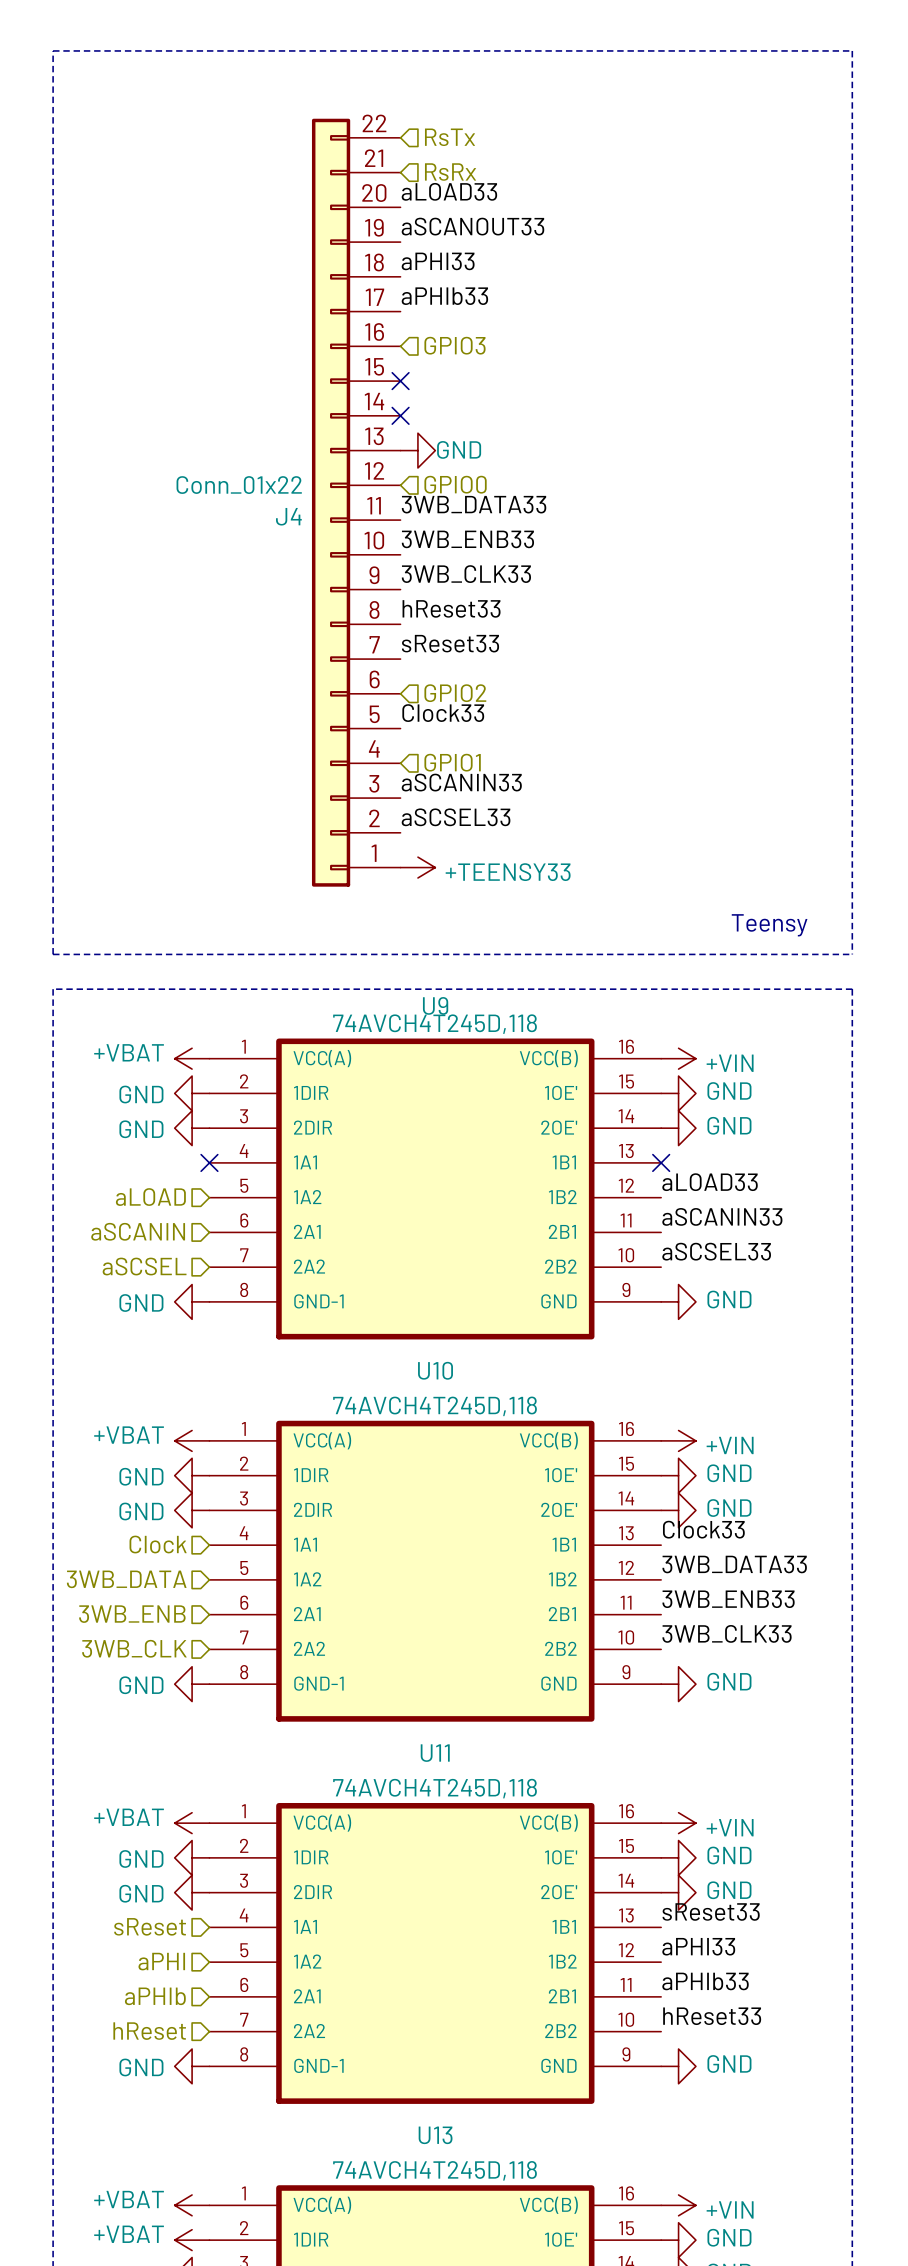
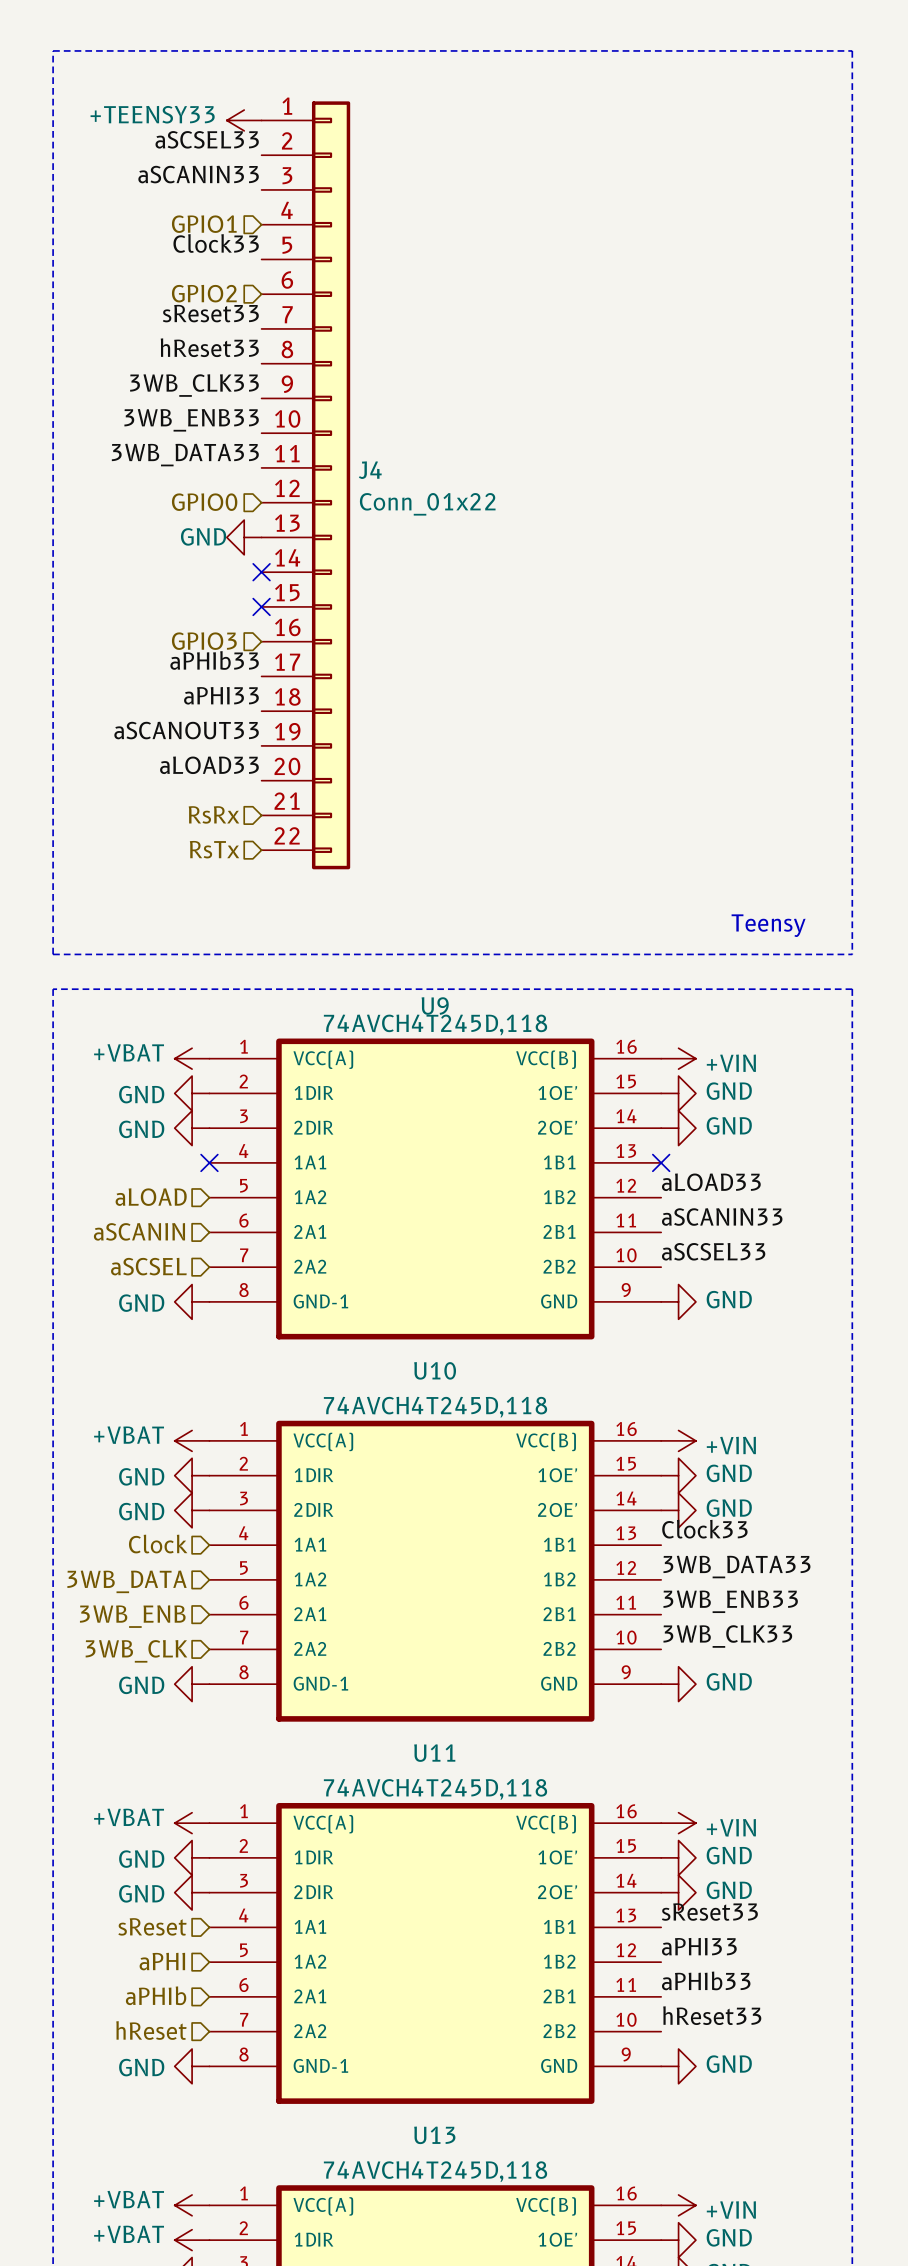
power symbol: none -> +TEENSY33 (244, 120)
hierarchical label: RsTx (450, 137) -> none
label: none -> aSCSEL33 (207, 139)
hierarchical label: RsRx (450, 172) -> none
label: none -> aSCANIN33 (198, 174)
label: aLOAD33 (449, 191) -> none
hierarchical label: none -> GPIO1 (204, 224)
label: aSCANOUT33 (472, 226) -> none
label: none -> Clock33 (216, 243)
label: aPHI33 (438, 261) -> none
hierarchical label: none -> GPIO2 (204, 293)
label: aPHIb33 (444, 296) -> none
label: none -> sReset33 (210, 313)
hierarchical label: GPIO3 (455, 345) -> none
no-connect mark: (400, 381) -> none
no-connect mark: (400, 415) -> none
power symbol rotation: 0° (417, 450) -> 180° (244, 537)
power symbol position: GND (417, 450) -> GND (244, 537)
hierarchical label rotation: 0° (455, 484) -> 180° (204, 502)
hierarchical label position: GPIO0 (455, 484) -> GPIO0 (204, 502)
J4 rotation: 0° (331, 502) -> 180° (331, 485)
label position: 3WB_DATA33 (474, 504) -> 3WB_DATA33 (185, 455)
label position: 3WB_ENB33 (467, 539) -> 3WB_ENB33 (191, 420)
no-connect mark: none -> (261, 572)
label position: 3WB_CLK33 (466, 574) -> 3WB_CLK33 (194, 385)
no-connect mark: none -> (261, 606)
label position: hReset33 (451, 608) -> hReset33 (209, 347)
hierarchical label: none -> GPIO3 (204, 641)
label: sReset33 (450, 643) -> none
label: none -> aPHIb33 (214, 660)
hierarchical label: GPIO2 (455, 693) -> none
label: none -> aPHI33 (221, 695)
label: Clock33 (443, 713) -> none
label: none -> aSCANOUT33 (186, 730)
hierarchical label: GPIO1 (452, 762) -> none
label: none -> aLOAD33 (209, 765)
label: aSCANIN33 (461, 782) -> none
hierarchical label: none -> RsRx (213, 814)
label: aSCSEL33 (456, 817) -> none
hierarchical label: none -> RsTx (214, 849)
power symbol: +TEENSY33 (417, 867) -> none

